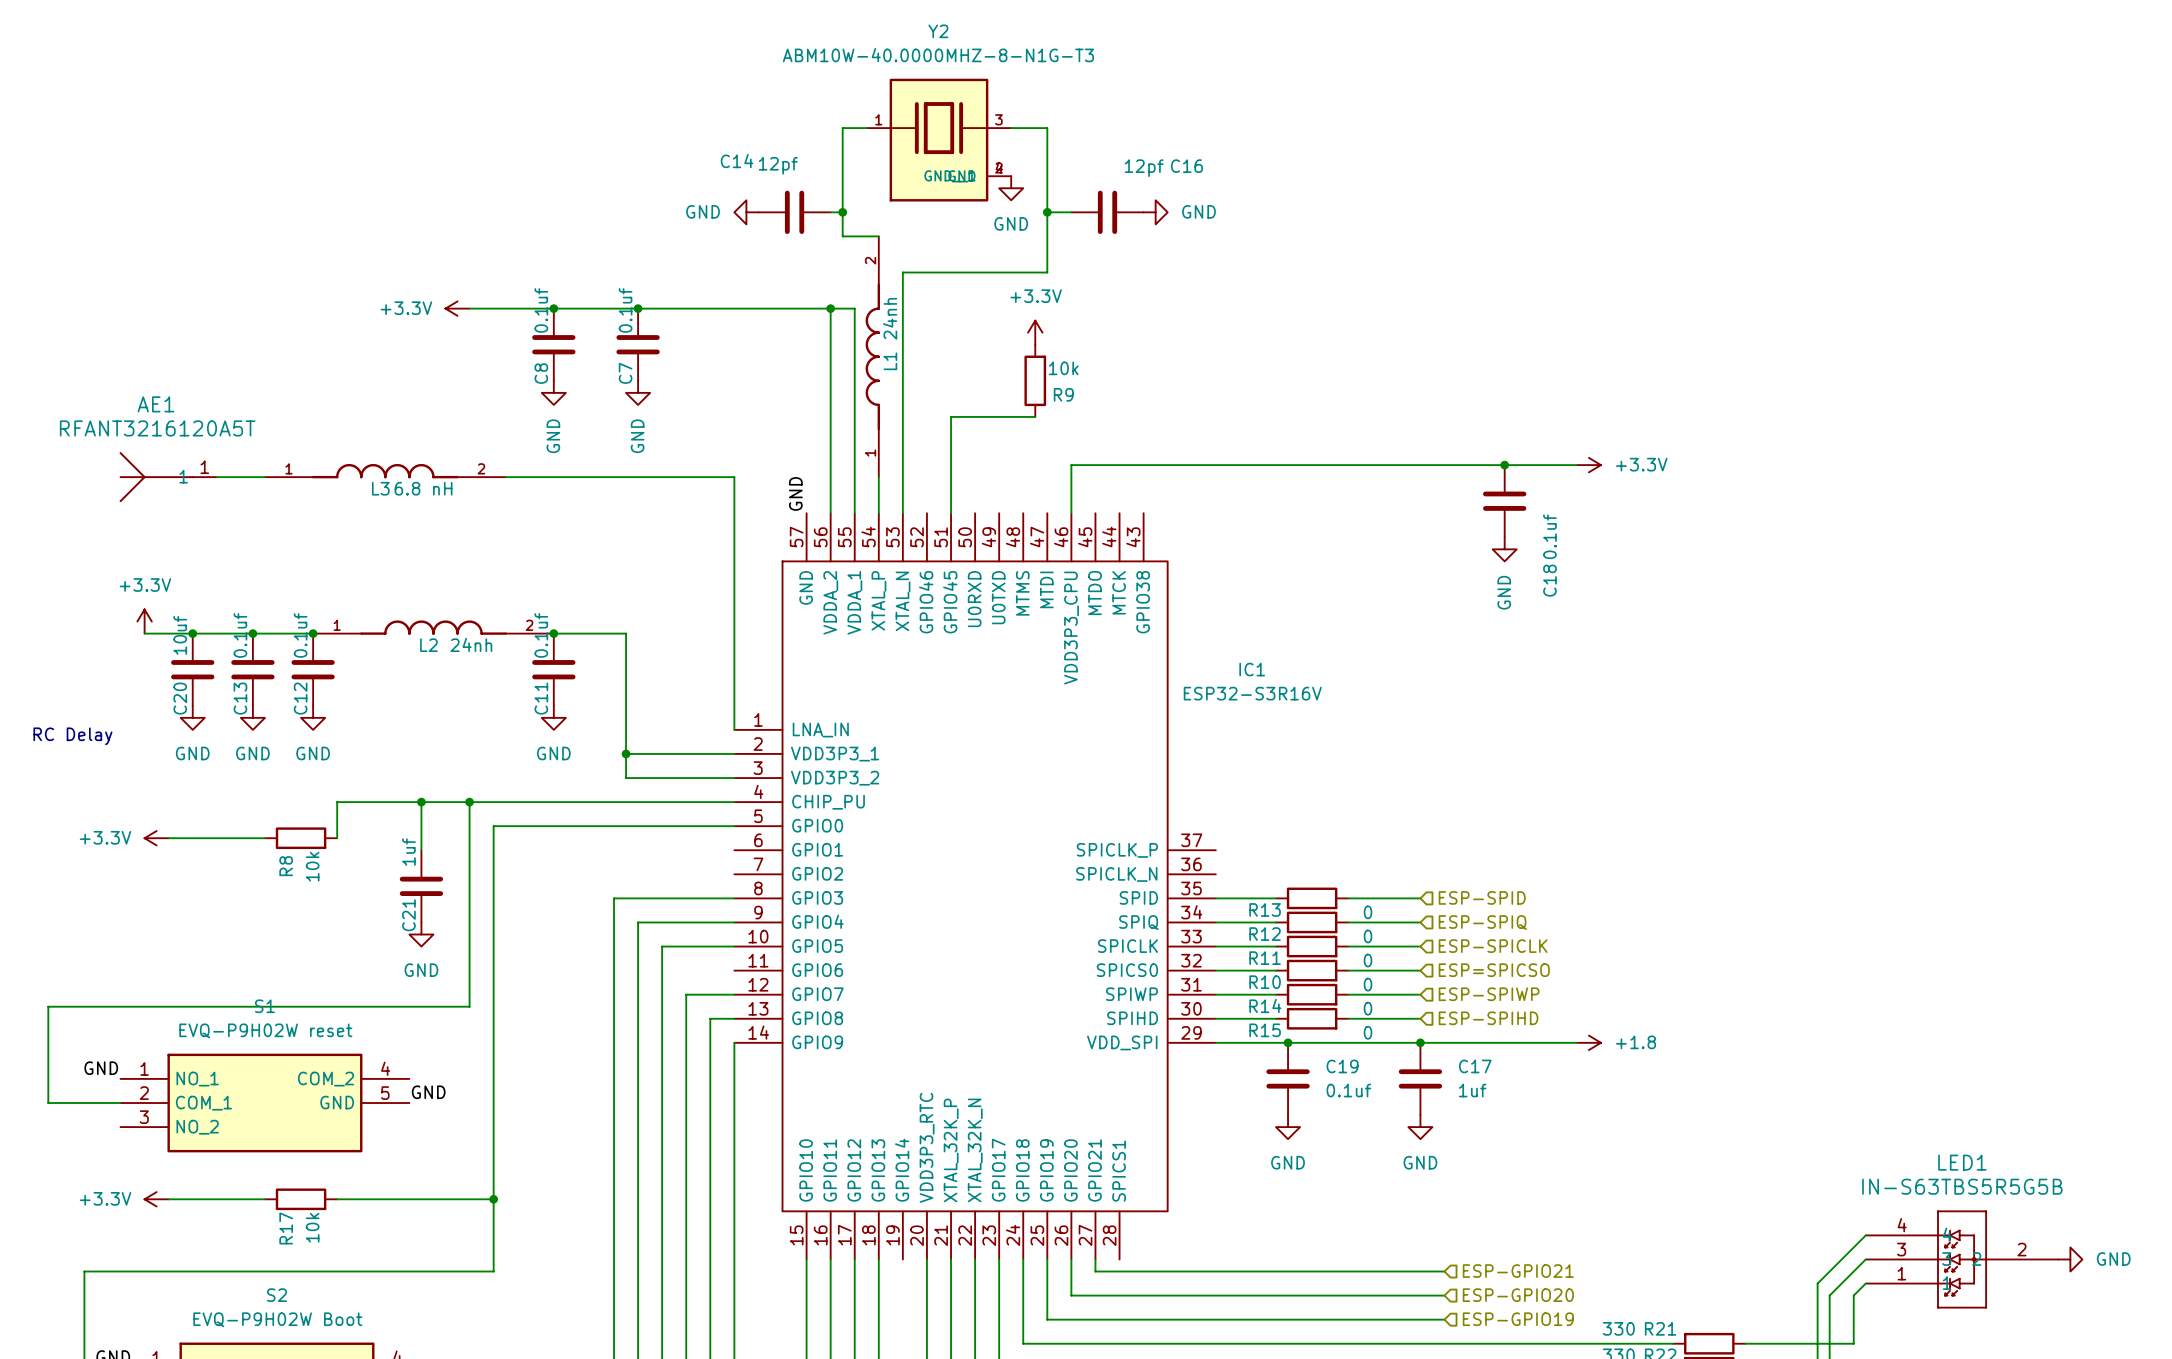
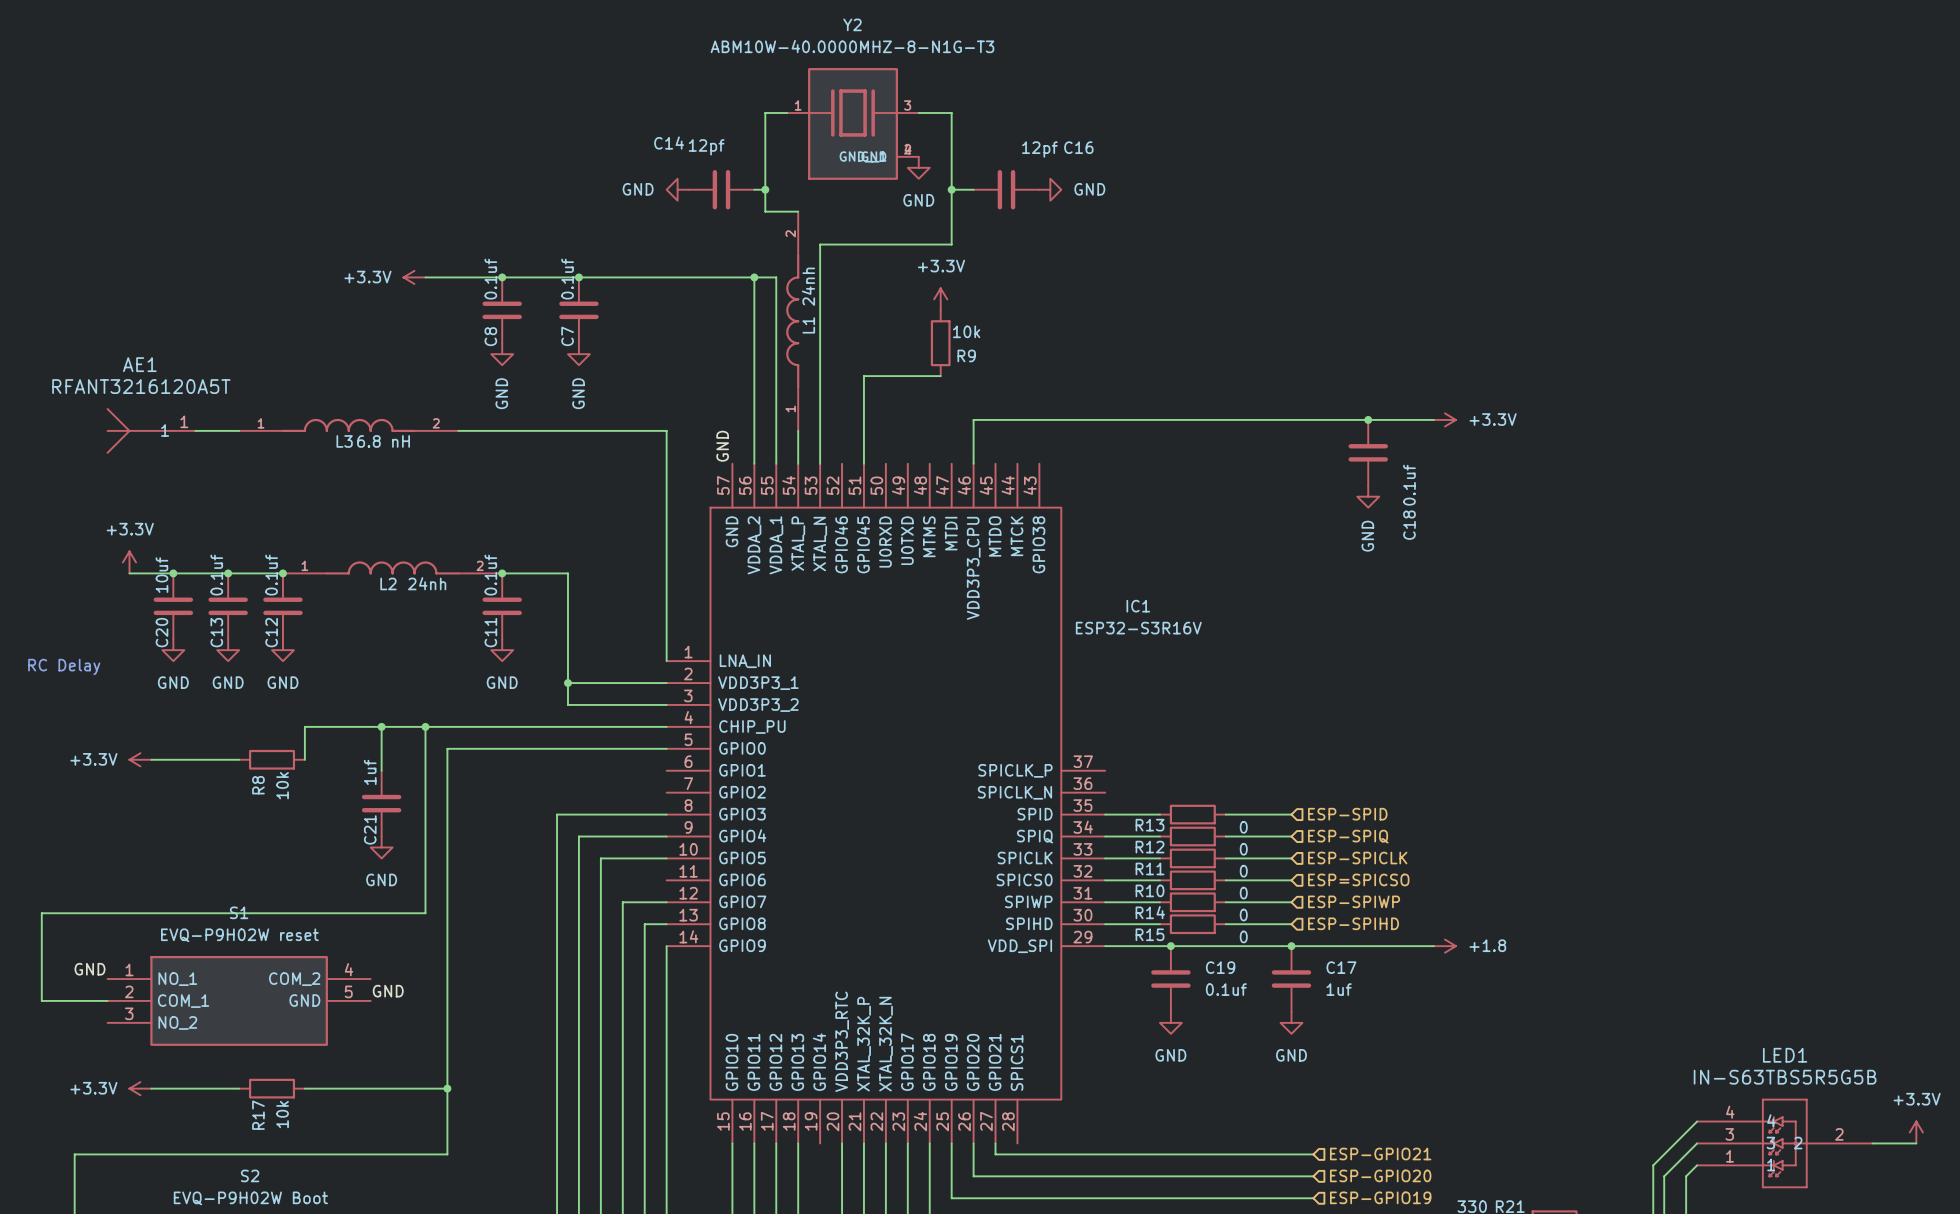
power symbol: none -> +3.3V (1916, 1132)
wire: none -> (1872, 1143) (1916, 1143)
power symbol: GND (2070, 1259) -> none

